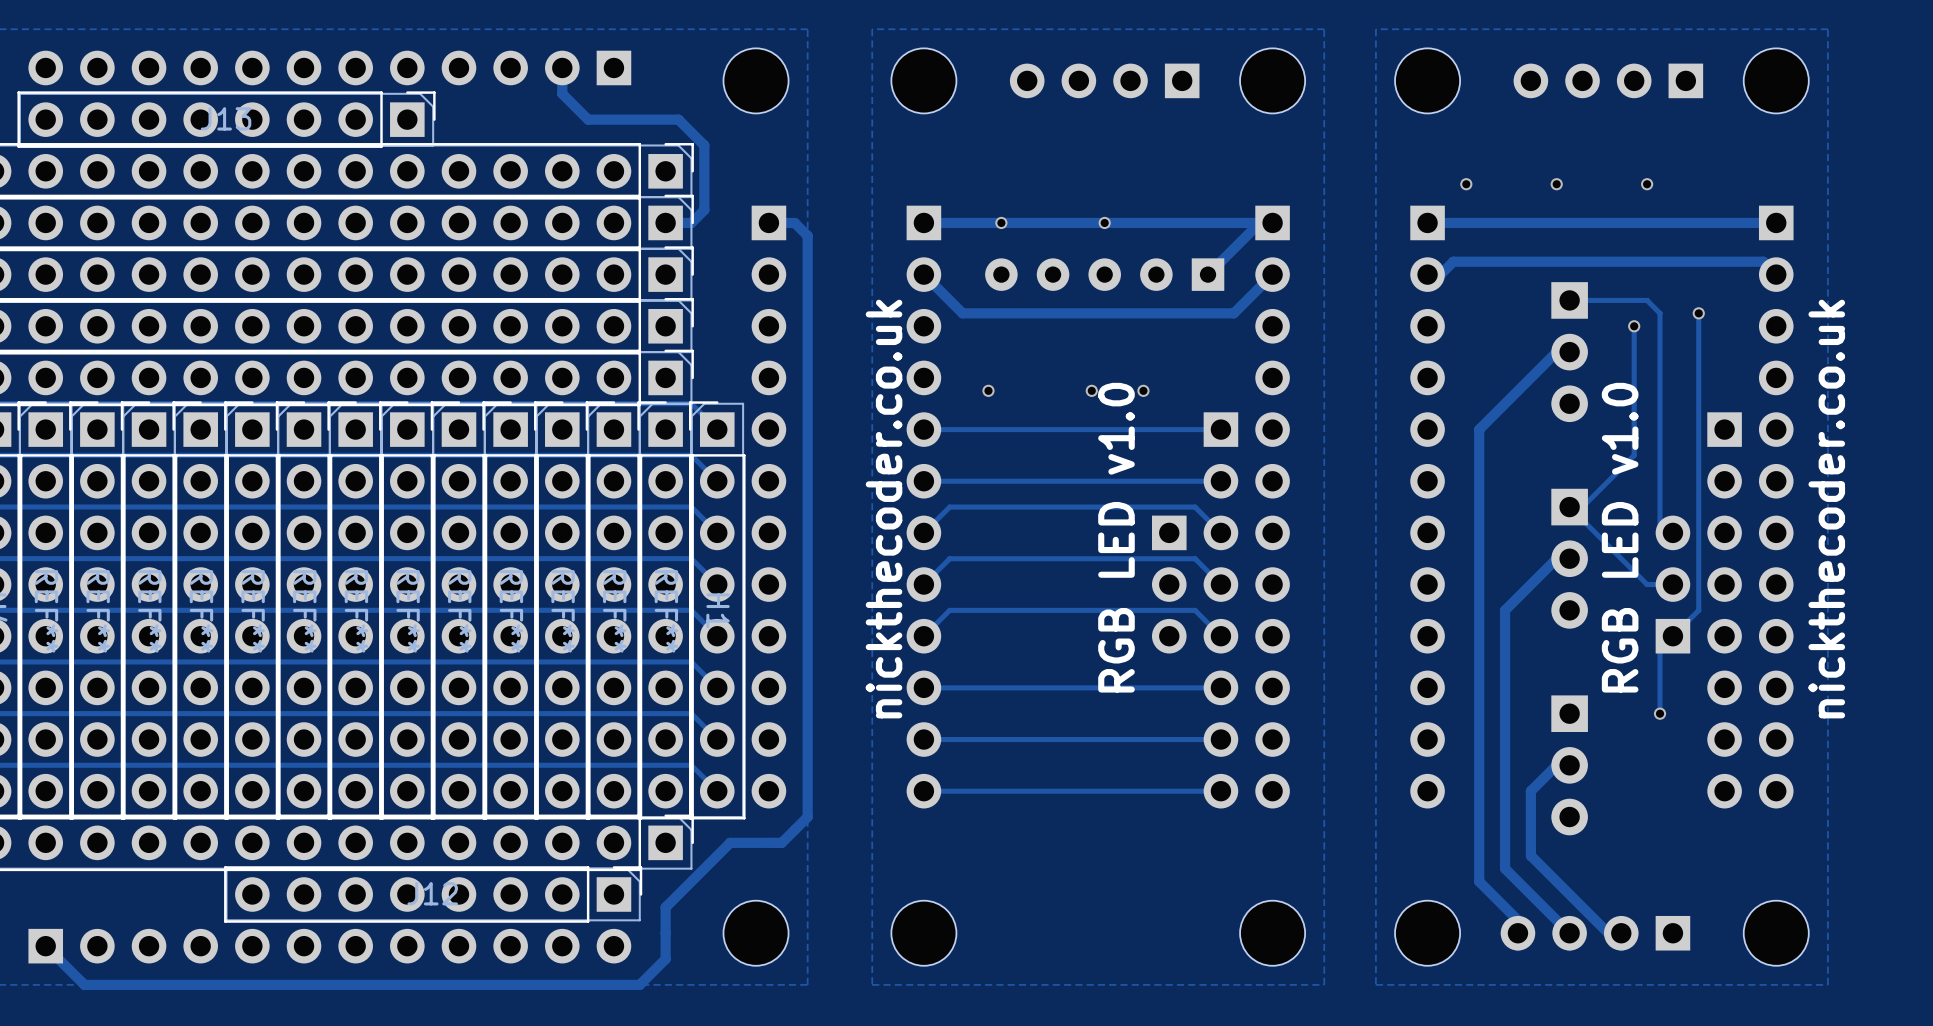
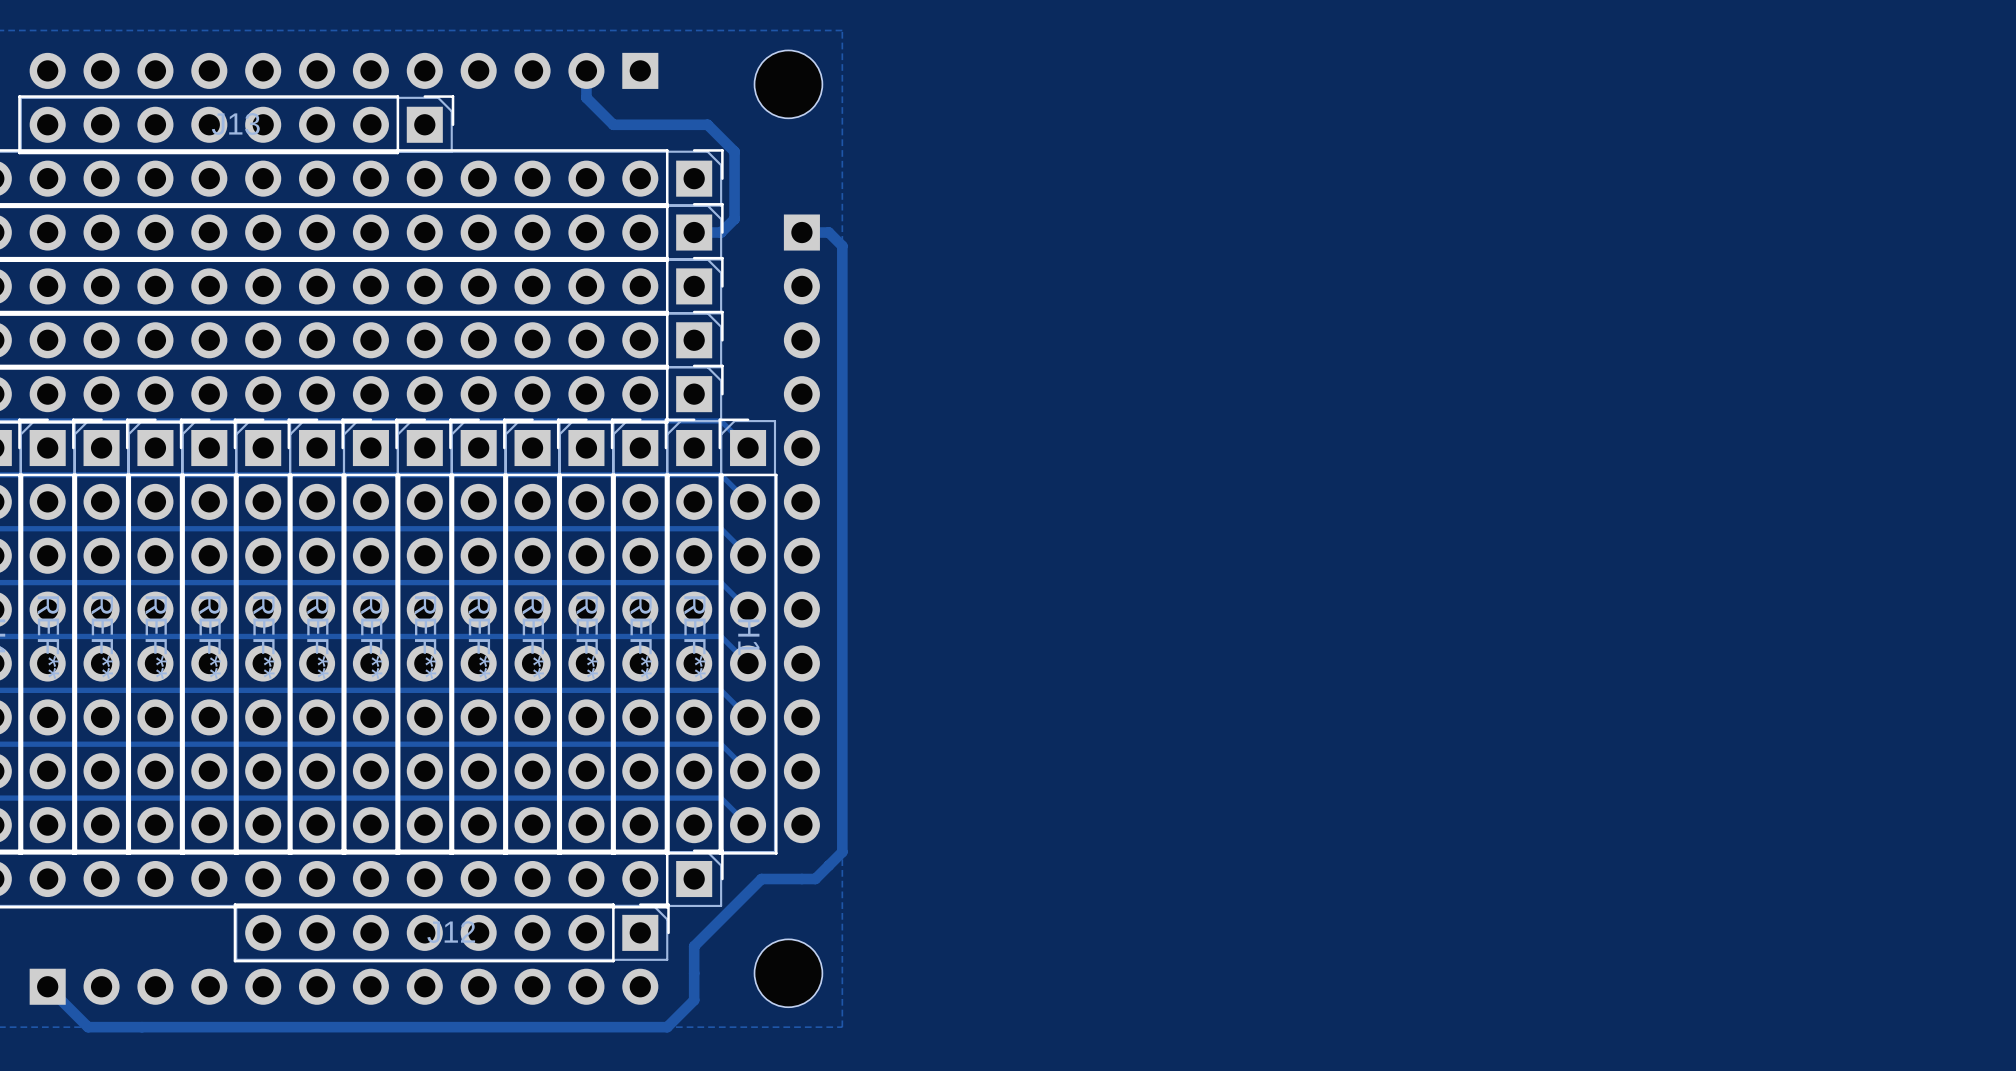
zone outline: (1324, 29) (1324, 984) (872, 984) (872, 29) (1324, 29) -> none
zone outline: (1827, 29) (1375, 29) (1375, 984) (1827, 984) (1827, 29) -> none
part: (923, 80) -> none
part: (1104, 80) -> none
part: (1272, 80) -> none
part: (1427, 80) -> none
part: (1608, 80) -> none
part: (1776, 80) -> none
via: (1466, 184) -> none
via: (1556, 184) -> none
via: (1647, 184) -> none
via: (1001, 222) -> none
via: (1104, 222) -> none
track: (1259, 222) (1208, 274) -> none
track: (1272, 222) (923, 222) -> none
track: (1776, 222) (1427, 222) -> none
part: (1104, 274) -> none
track: (1272, 274) (1233, 313) (962, 313) (923, 274) -> none
track: (1776, 274) (1763, 261) (1453, 261) (1440, 274) (1427, 274) -> none
track: (1569, 300) (1647, 300) (1660, 313) (1660, 532) -> none
track: (1698, 313) (1698, 610) (1672, 636) (1660, 636) (1660, 713) -> none
via: (1698, 313) -> none
track: (1634, 326) (1634, 455) (1582, 507) (1569, 507) (1647, 584) (1660, 584) -> none
via: (1634, 326) -> none
track: (1569, 352) (1556, 352) (1479, 429) (1479, 881) (1517, 920) (1517, 946) -> none
part: (1569, 352) -> none
via: (988, 390) -> none
via: (1091, 390) -> none
via: (1143, 390) -> none
track: (1220, 429) (923, 429) -> none
track: (1220, 481) (923, 481) -> none
part: (923, 507) -> none
part: (1272, 507) -> none
part: (1427, 507) -> none
part: (1776, 507) -> none
text: nickthecoder.co.uk (884, 509) -> none
text: nickthecoder.co.uk (1826, 509) -> none
track: (1220, 532) (1195, 507) (949, 507) (923, 532) -> none
text: RGB LED v1.0 (1116, 537) -> none
text: RGB LED v1.0 (1620, 537) -> none
track: (1569, 558) (1556, 558) (1505, 610) (1505, 868) (1569, 933) (1569, 946) -> none
part: (1569, 558) -> none
part: (1169, 584) -> none
track: (1220, 584) (1195, 558) (949, 558) (923, 584) -> none
part: (1672, 584) -> none
part: (1220, 610) -> none
part: (1724, 610) -> none
track: (1220, 636) (1195, 610) (949, 610) (923, 636) -> none
track: (1220, 687) (923, 687) -> none
via: (1660, 713) -> none
track: (1220, 739) (923, 739) -> none
track: (1569, 765) (1556, 765) (1530, 791) (1530, 855) (1621, 946) -> none
part: (1569, 765) -> none
track: (1220, 791) (923, 791) -> none
part: (923, 933) -> none
part: (1272, 933) -> none
part: (1427, 933) -> none
part: (1595, 933) -> none
part: (1776, 933) -> none

